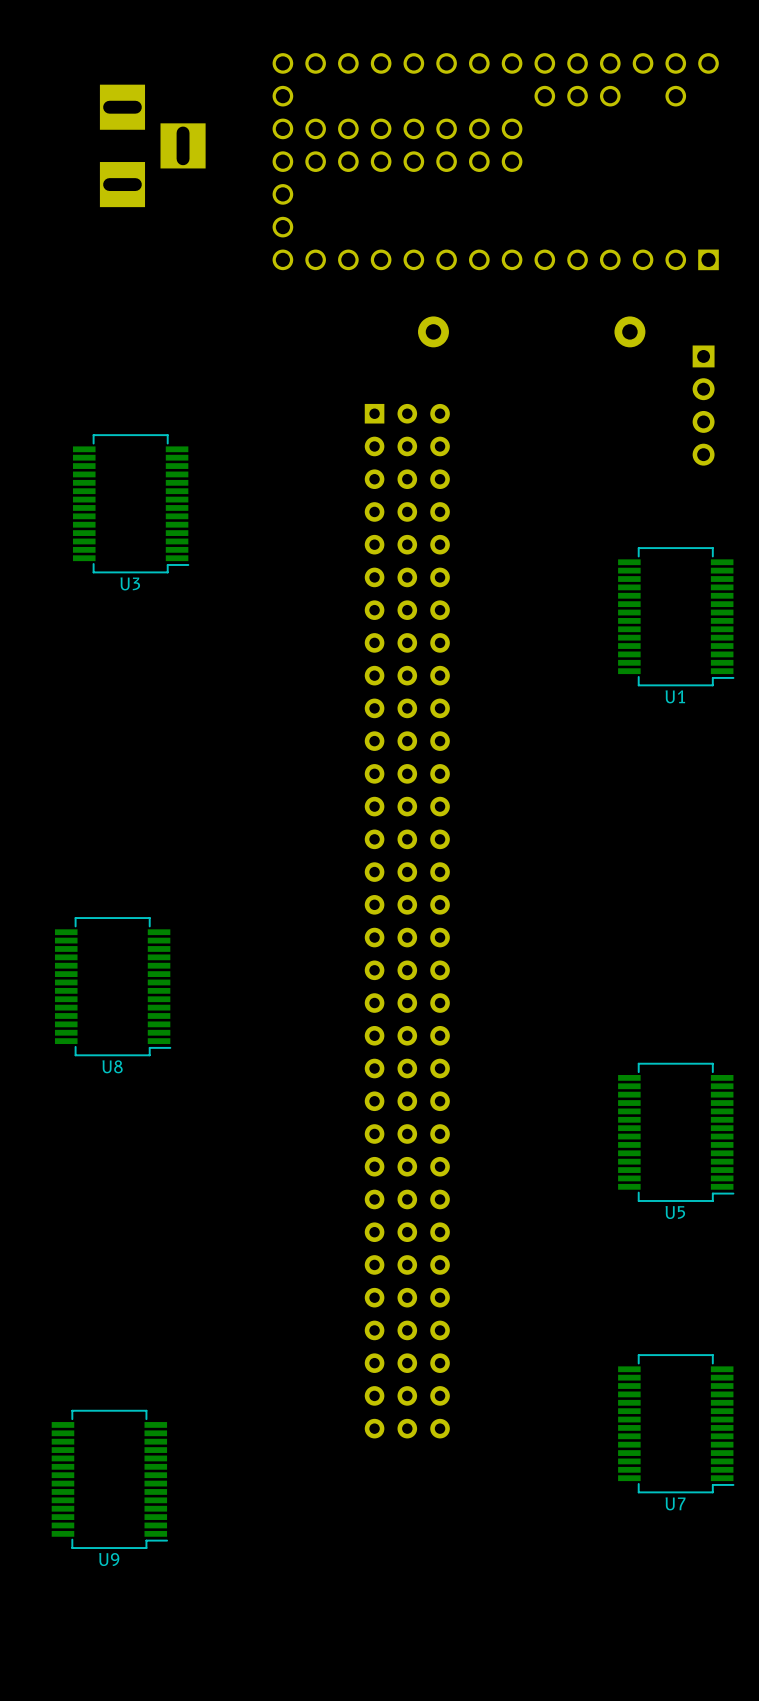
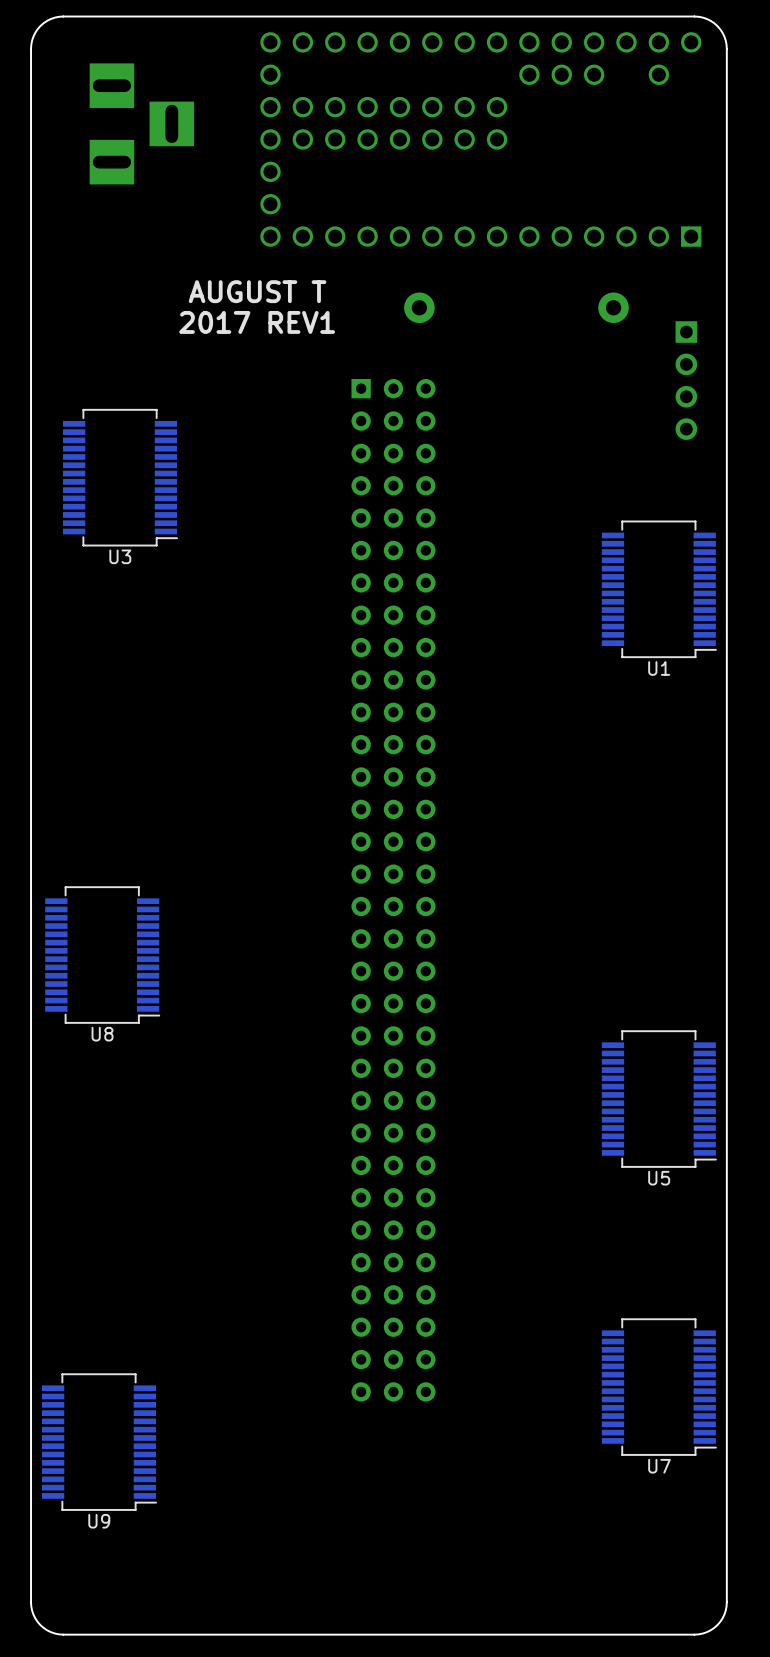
board edge: none -> (694, 16) (63, 16) (55, 17) (43, 23) (33, 36) (31, 48) (31, 1602) (35, 1618) (43, 1627) (51, 1632) (63, 1634) (694, 1634) (710, 1630) (720, 1621) (724, 1614) (726, 1602) (726, 48) (724, 36) (717, 25) (706, 18) (694, 16)
text: none -> AUGUST T (257, 291)
text: none -> 2017 REV1 (257, 322)

